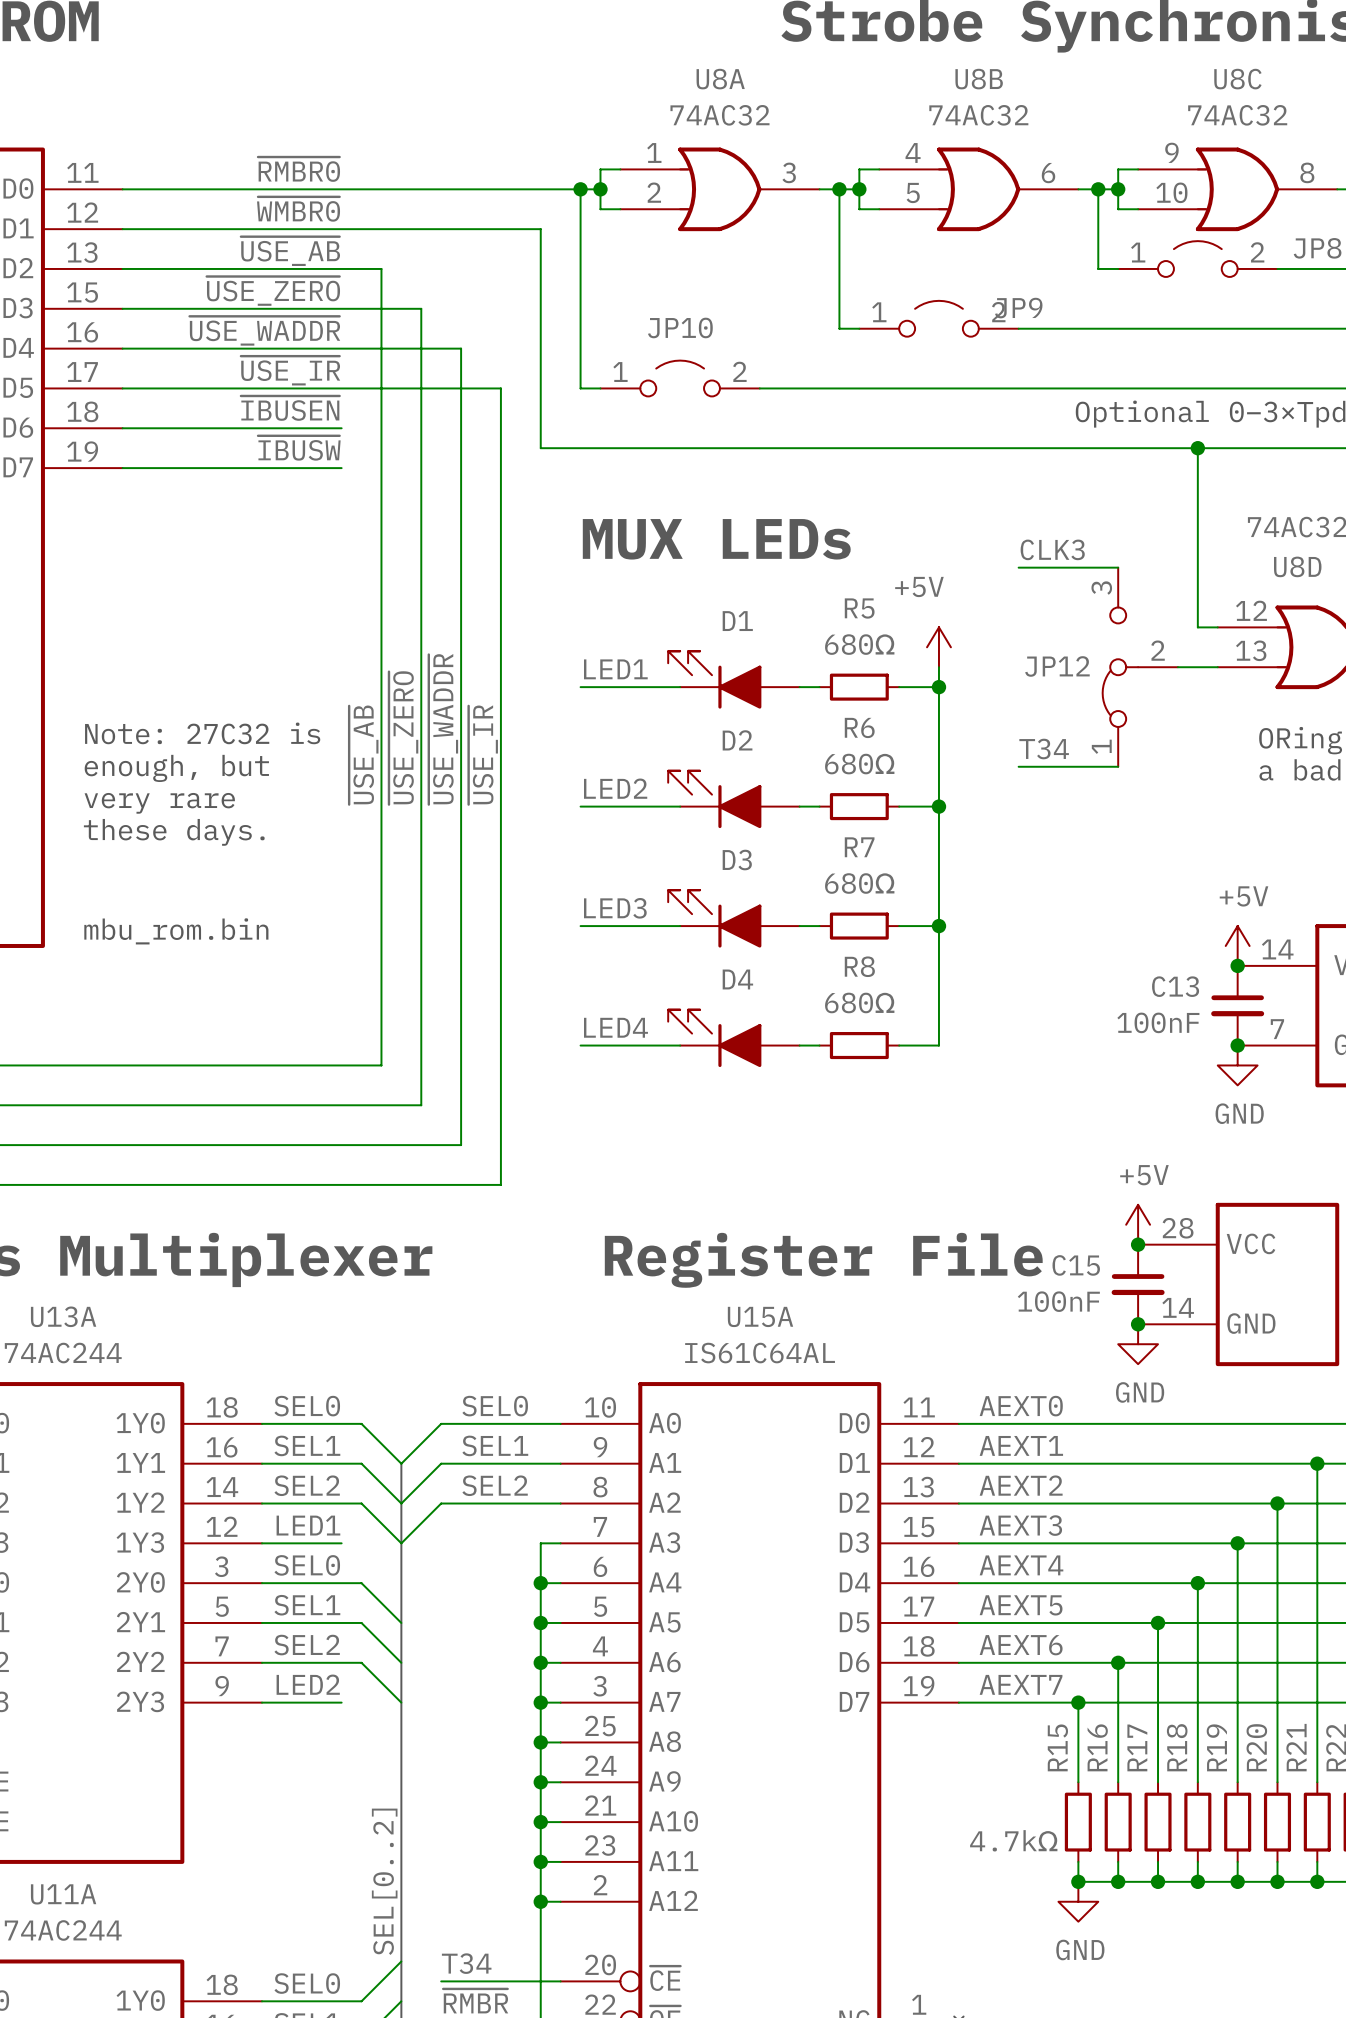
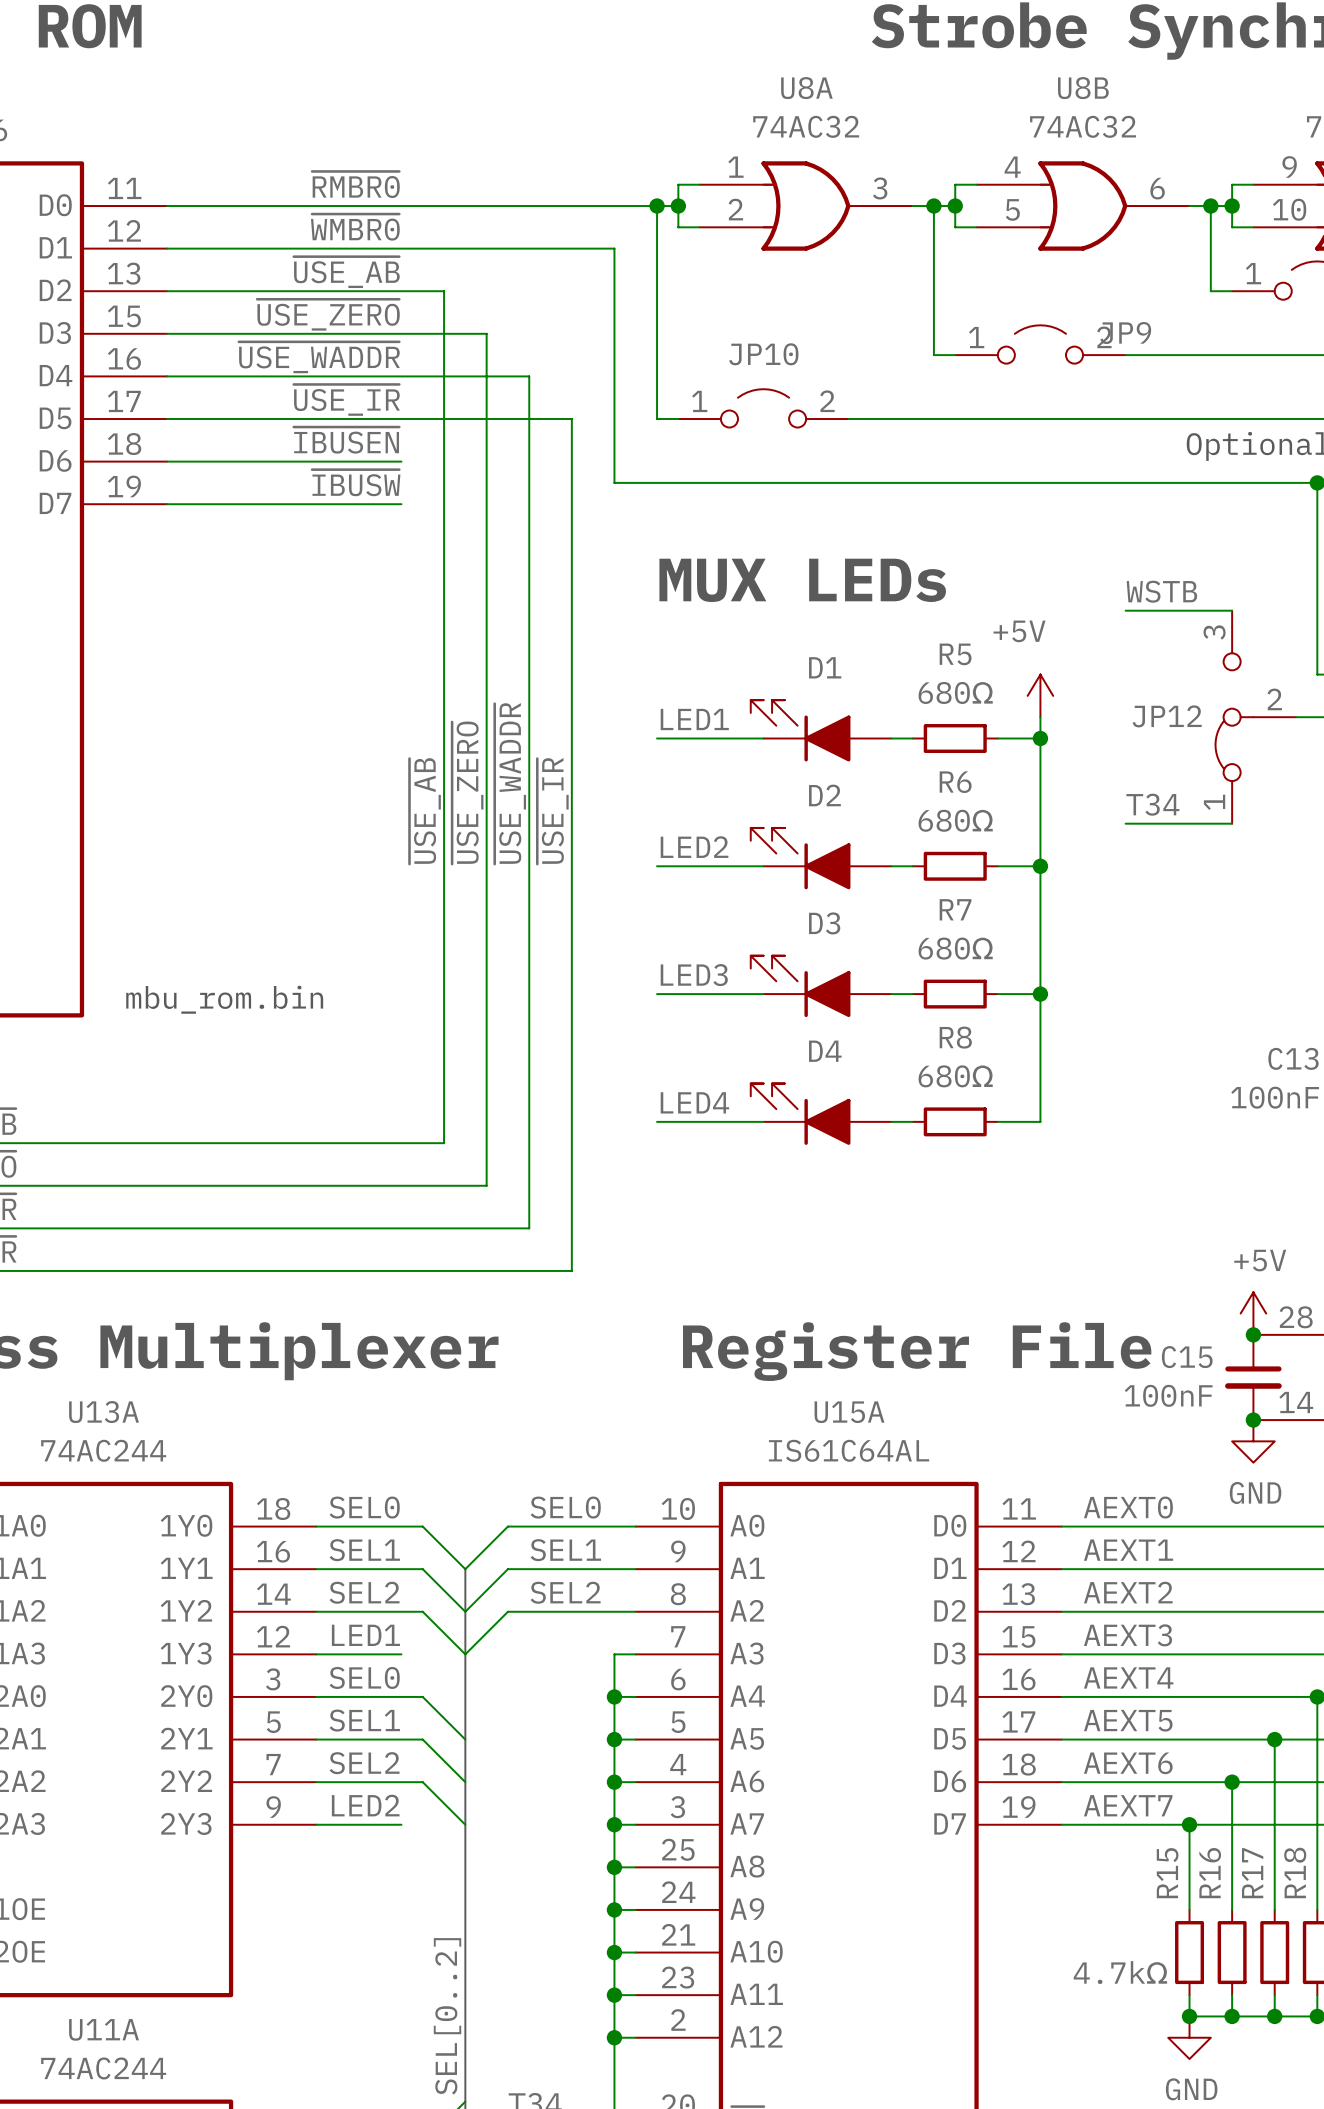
label: CLK3 (1052, 549) -> WSTB (1161, 591)
text: Note: 27C32 is (202, 733) -> none
text: enough, but (176, 768) -> none
text: very rare (159, 803) -> none
text: these days. (174, 832) -> none

